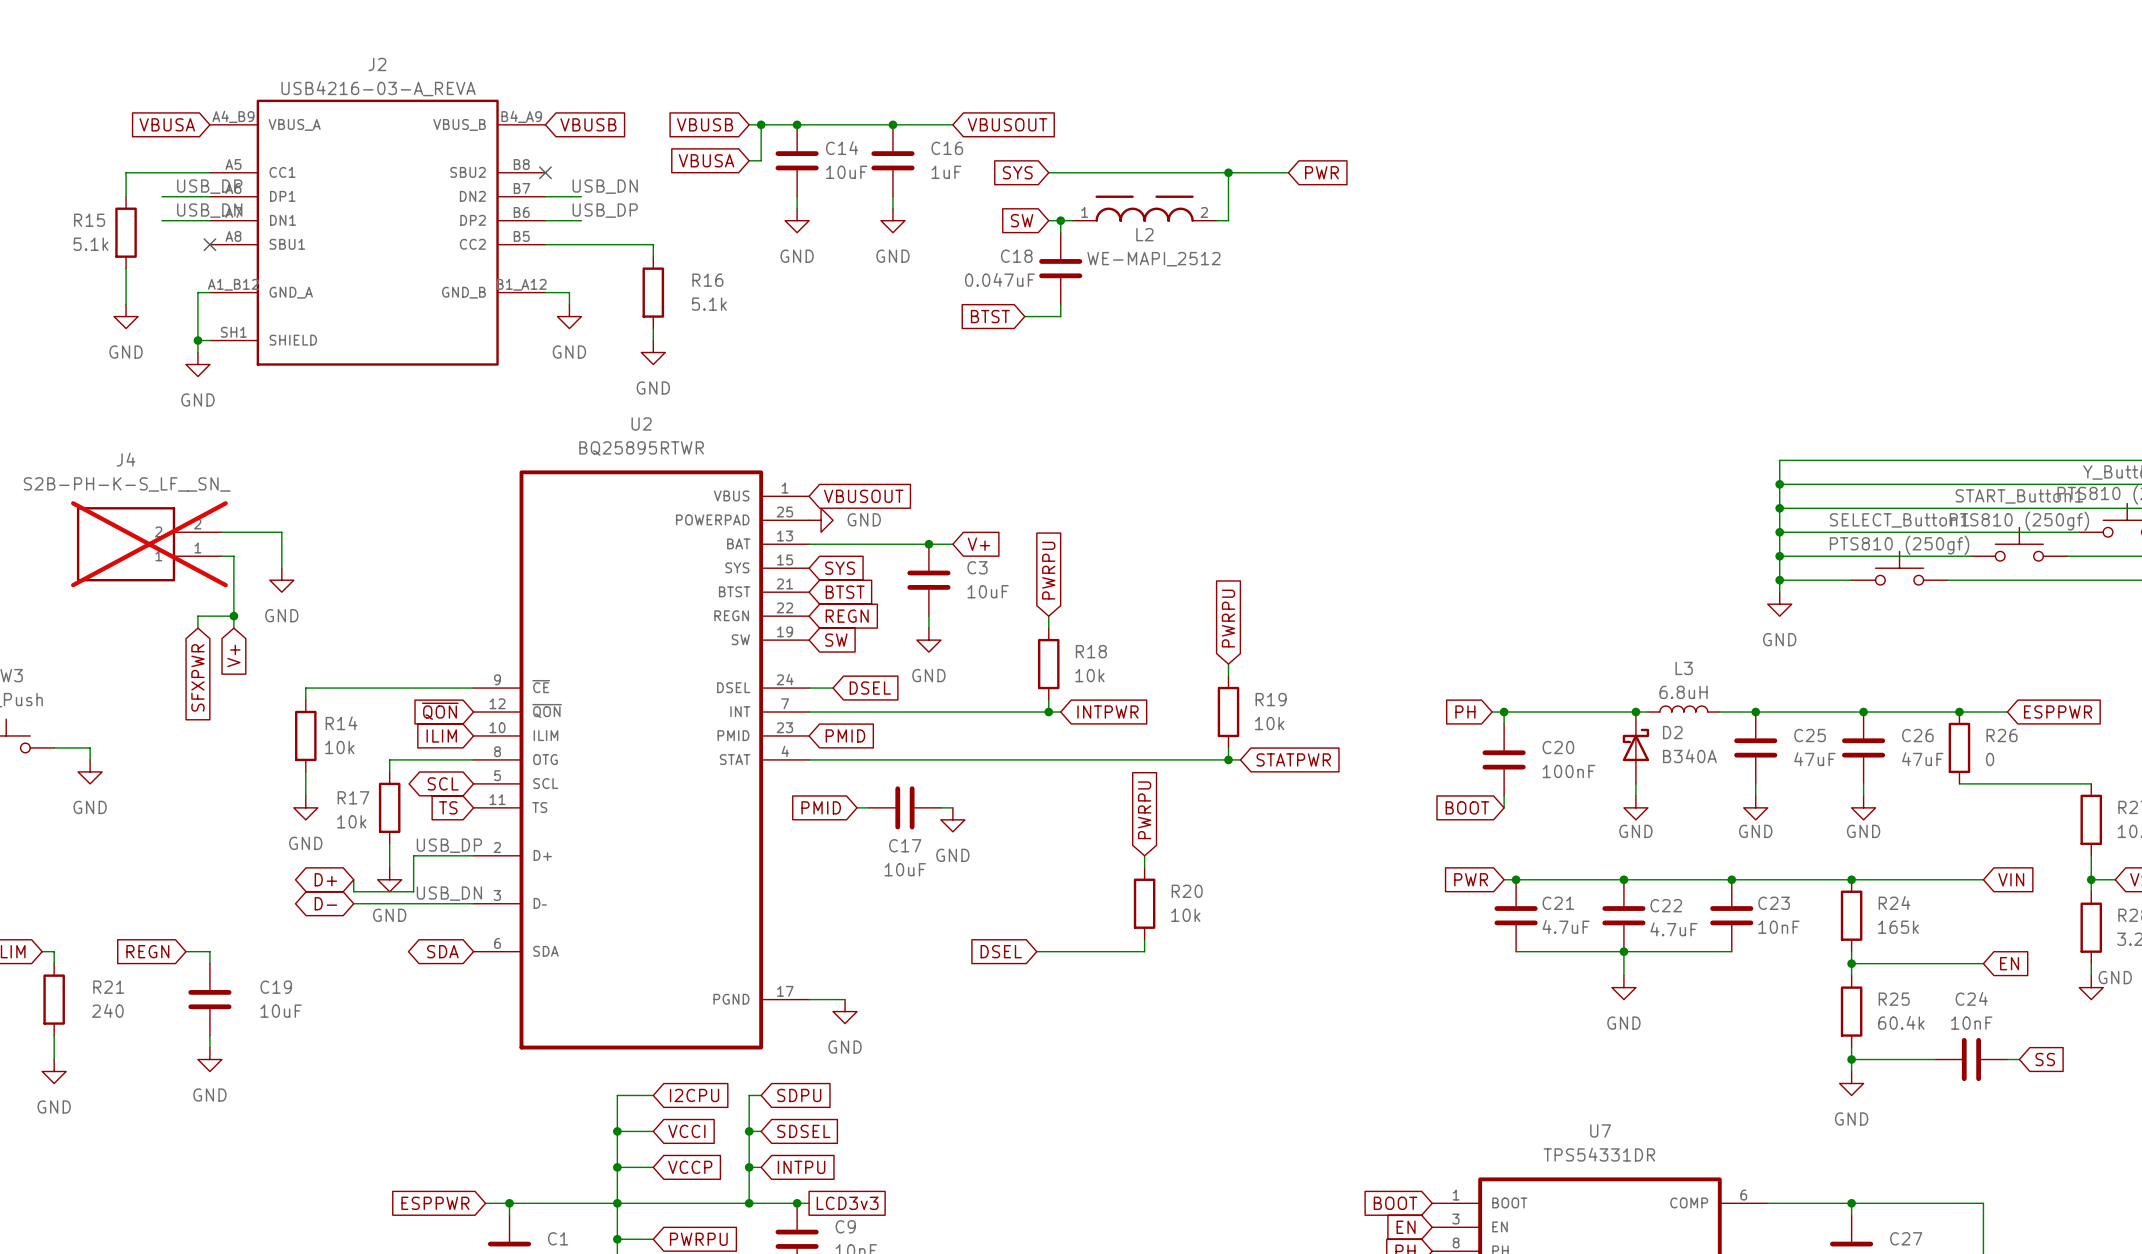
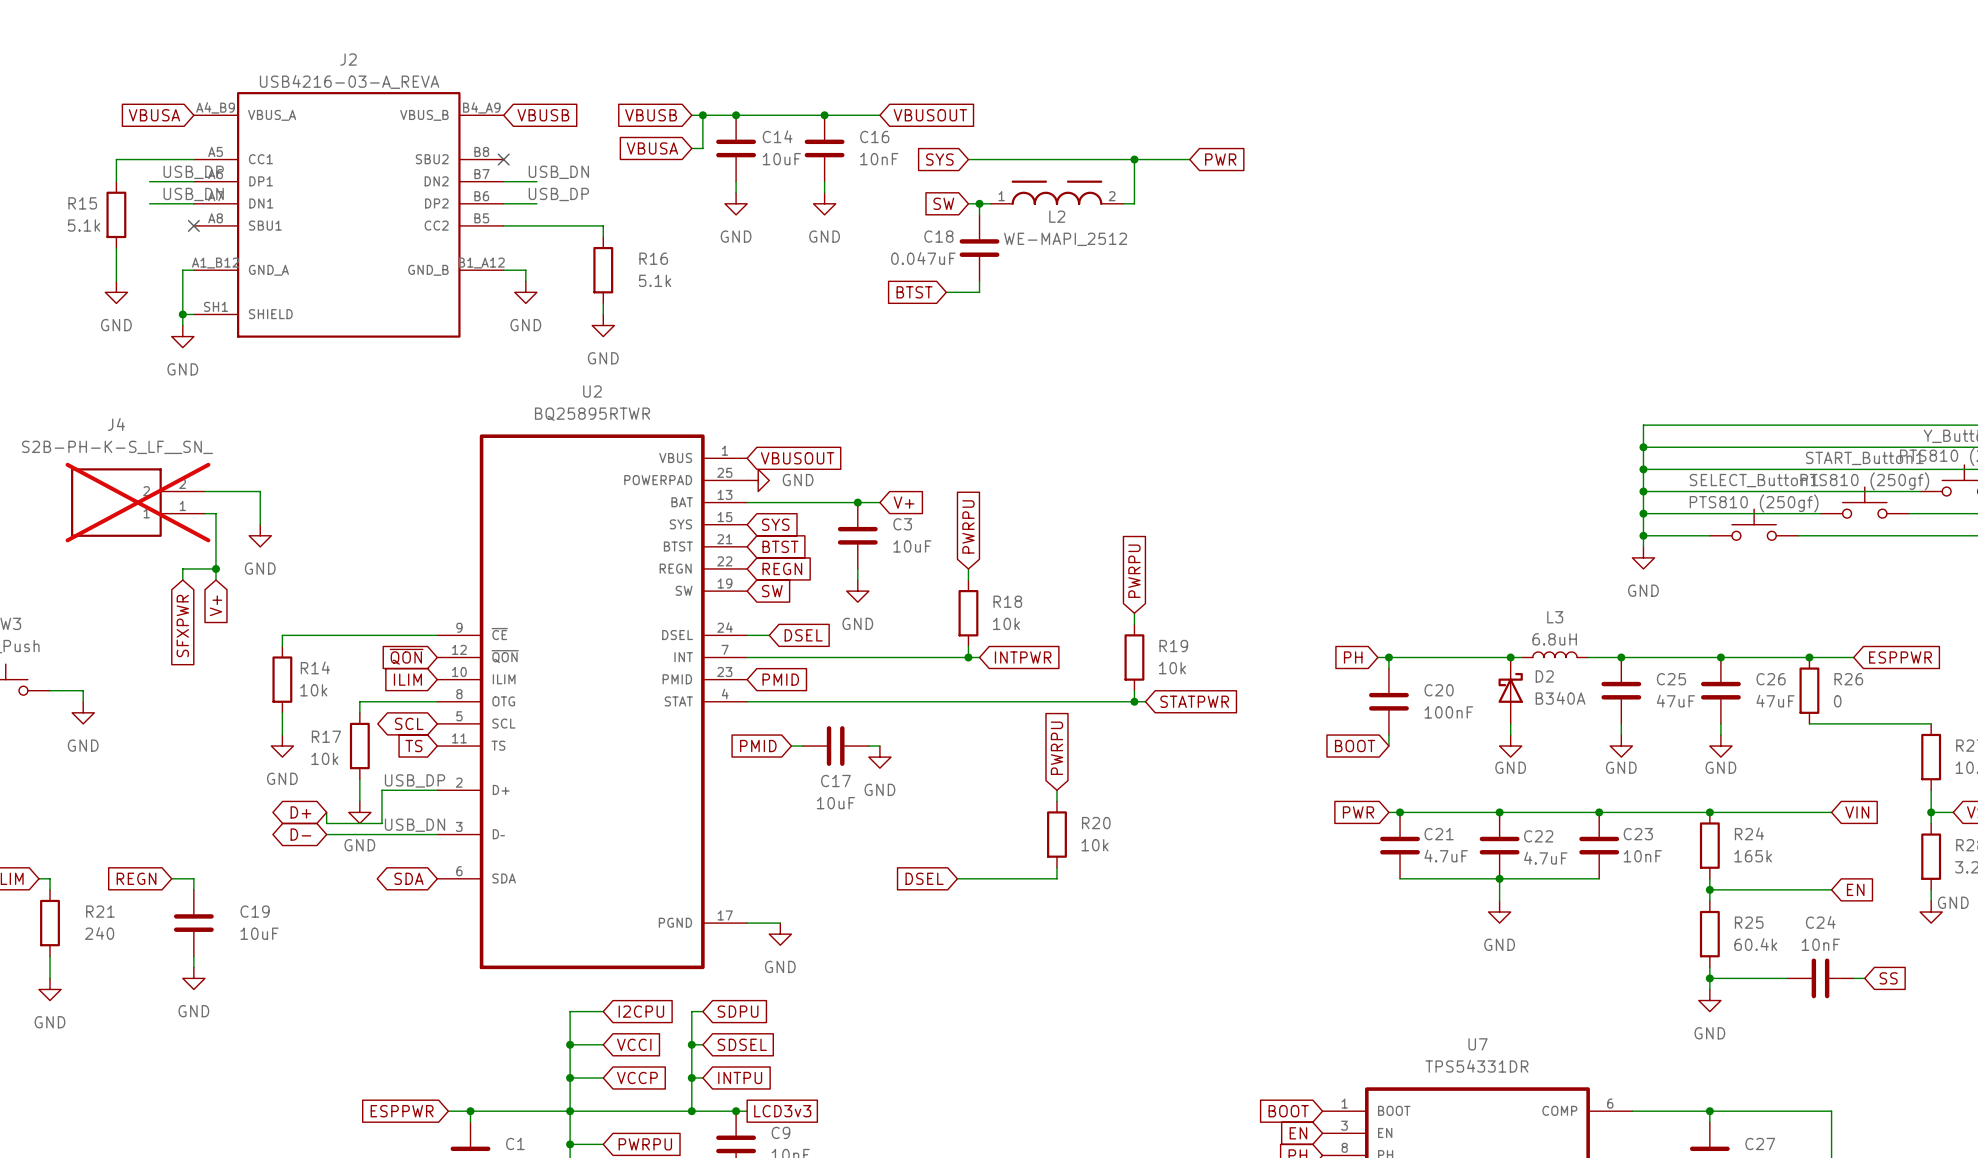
C16 value: 1uF (946, 172) -> 10nF (879, 159)

